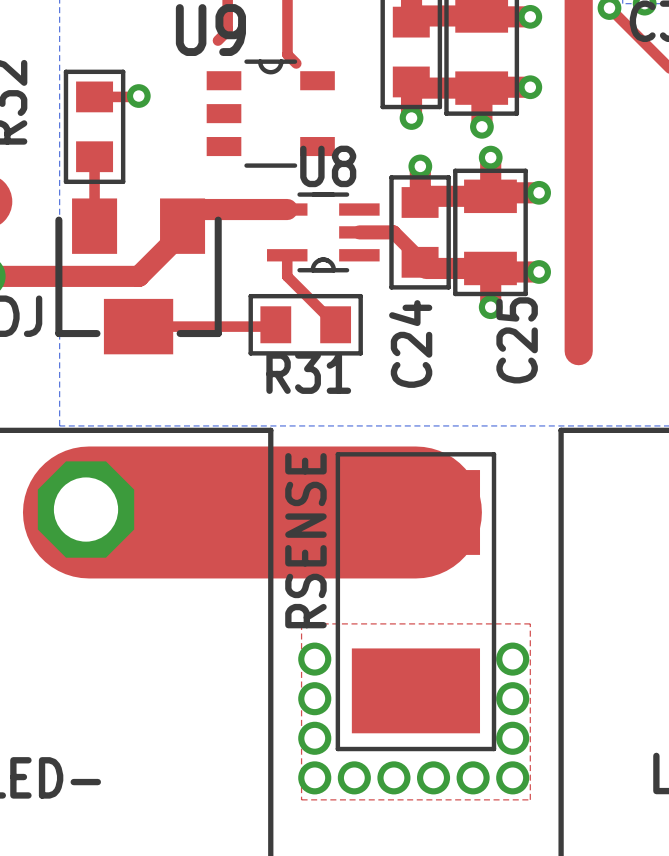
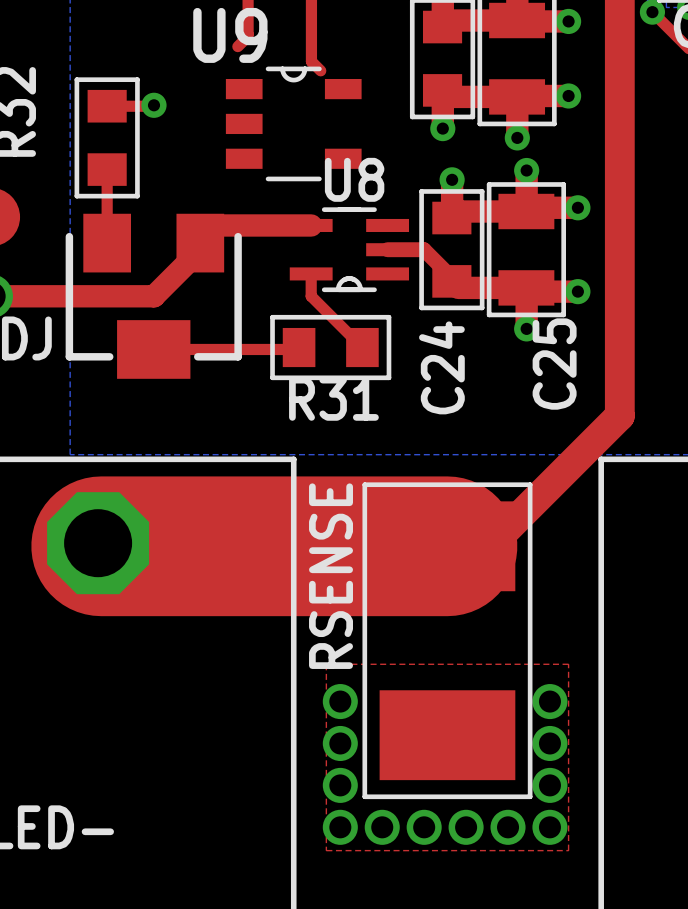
top track: none -> (619, 375) (619, 415) (489, 546)

